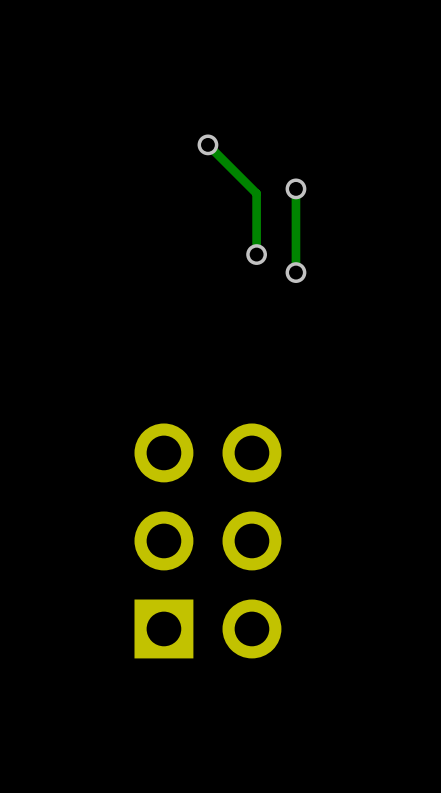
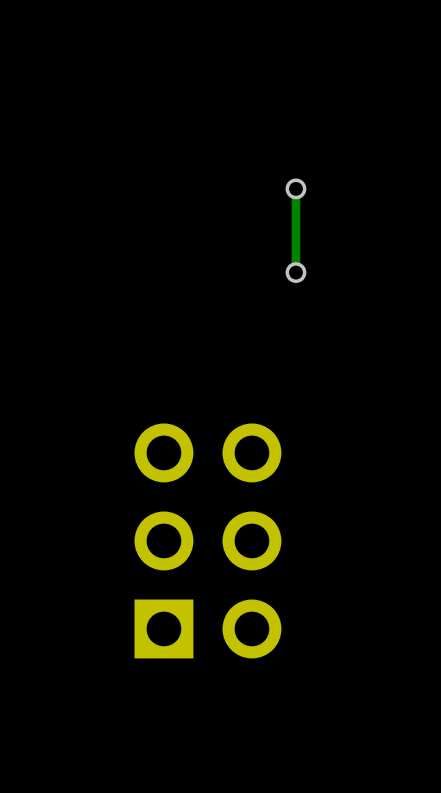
track: (207, 144) (256, 193) (256, 254) -> none
via: (207, 144) -> none
via: (256, 254) -> none

